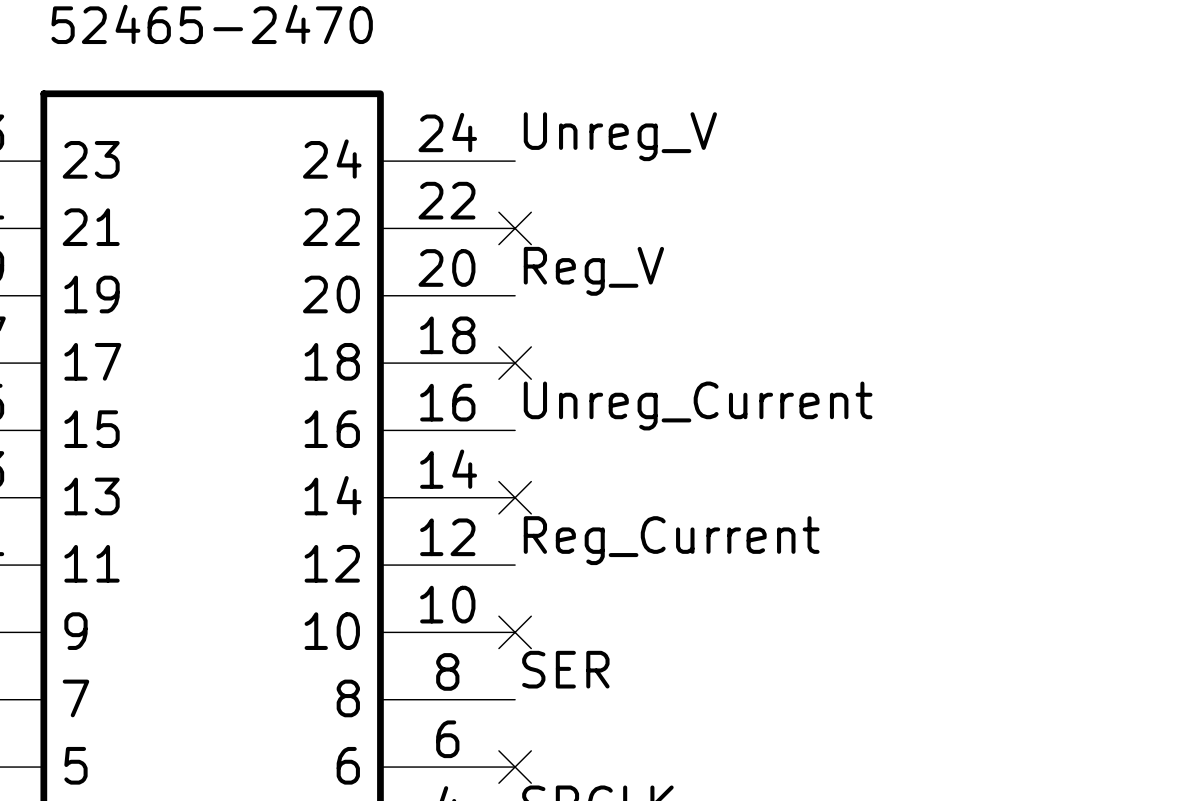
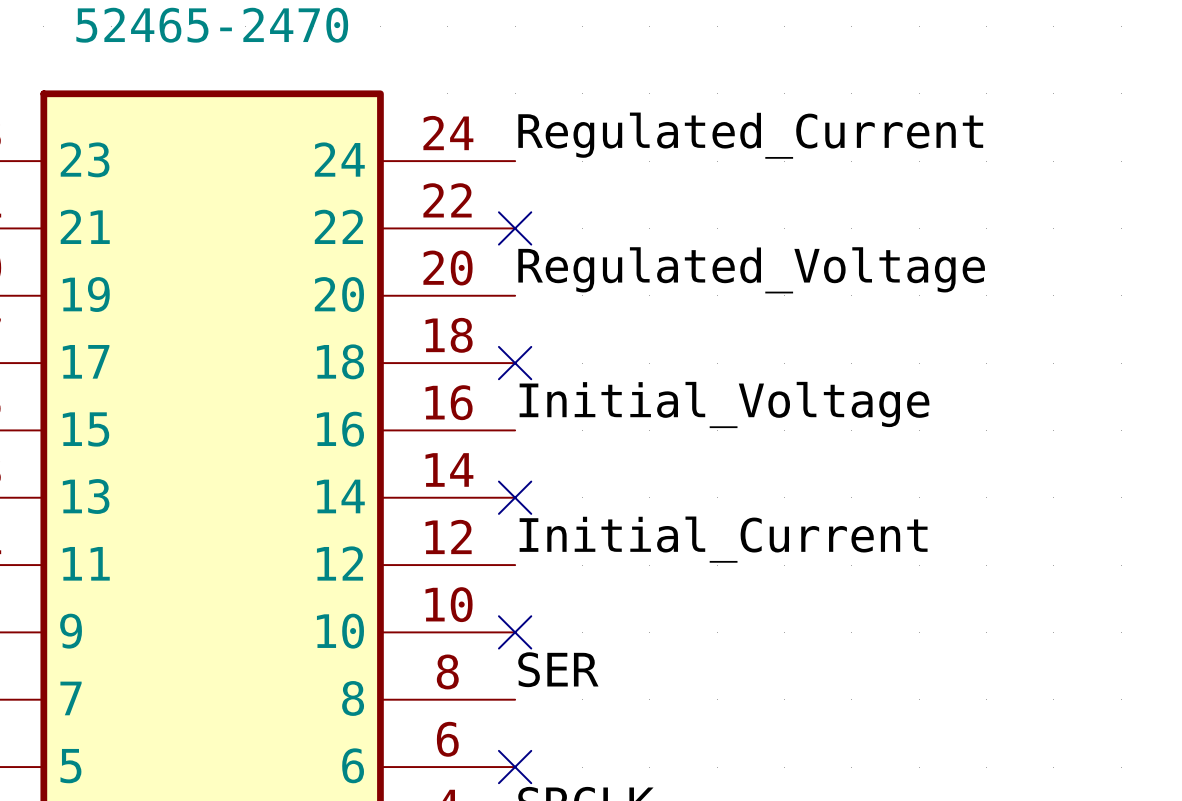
label: Unreg_V (620, 136) -> Regulated_Current (750, 135)
label: Reg_V (593, 271) -> Regulated_Voltage (751, 270)
label: Unreg_Current (698, 405) -> Initial_Voltage (724, 404)
label: Reg_Current (671, 540) -> Initial_Current (723, 539)

